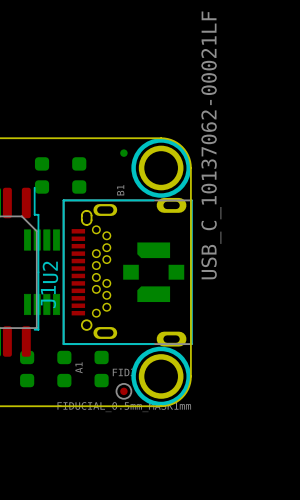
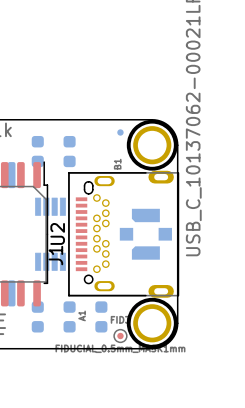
part: none -> (37, 151)
part: (42, 175) -> none
part: none -> (69, 151)
part: (79, 175) -> none

